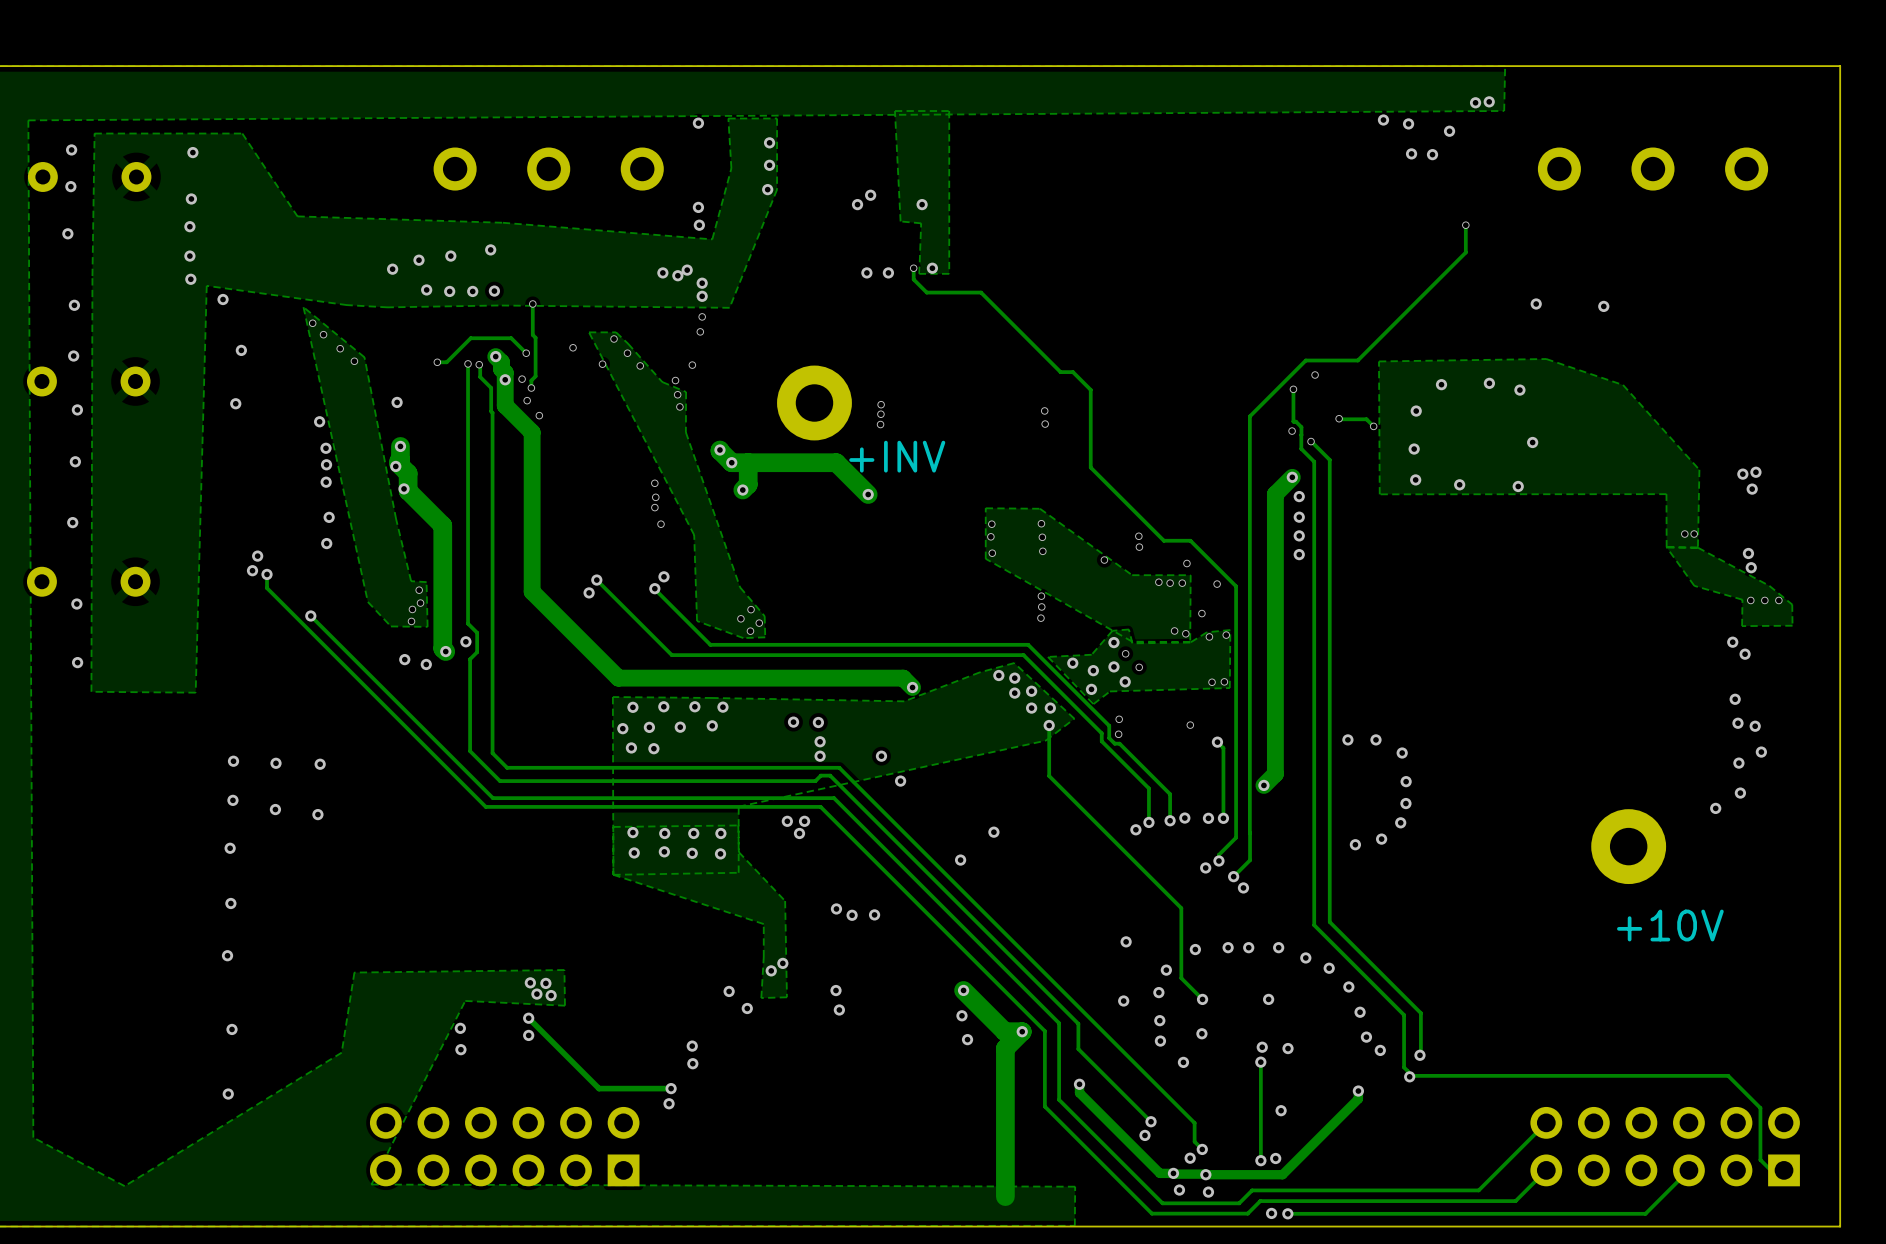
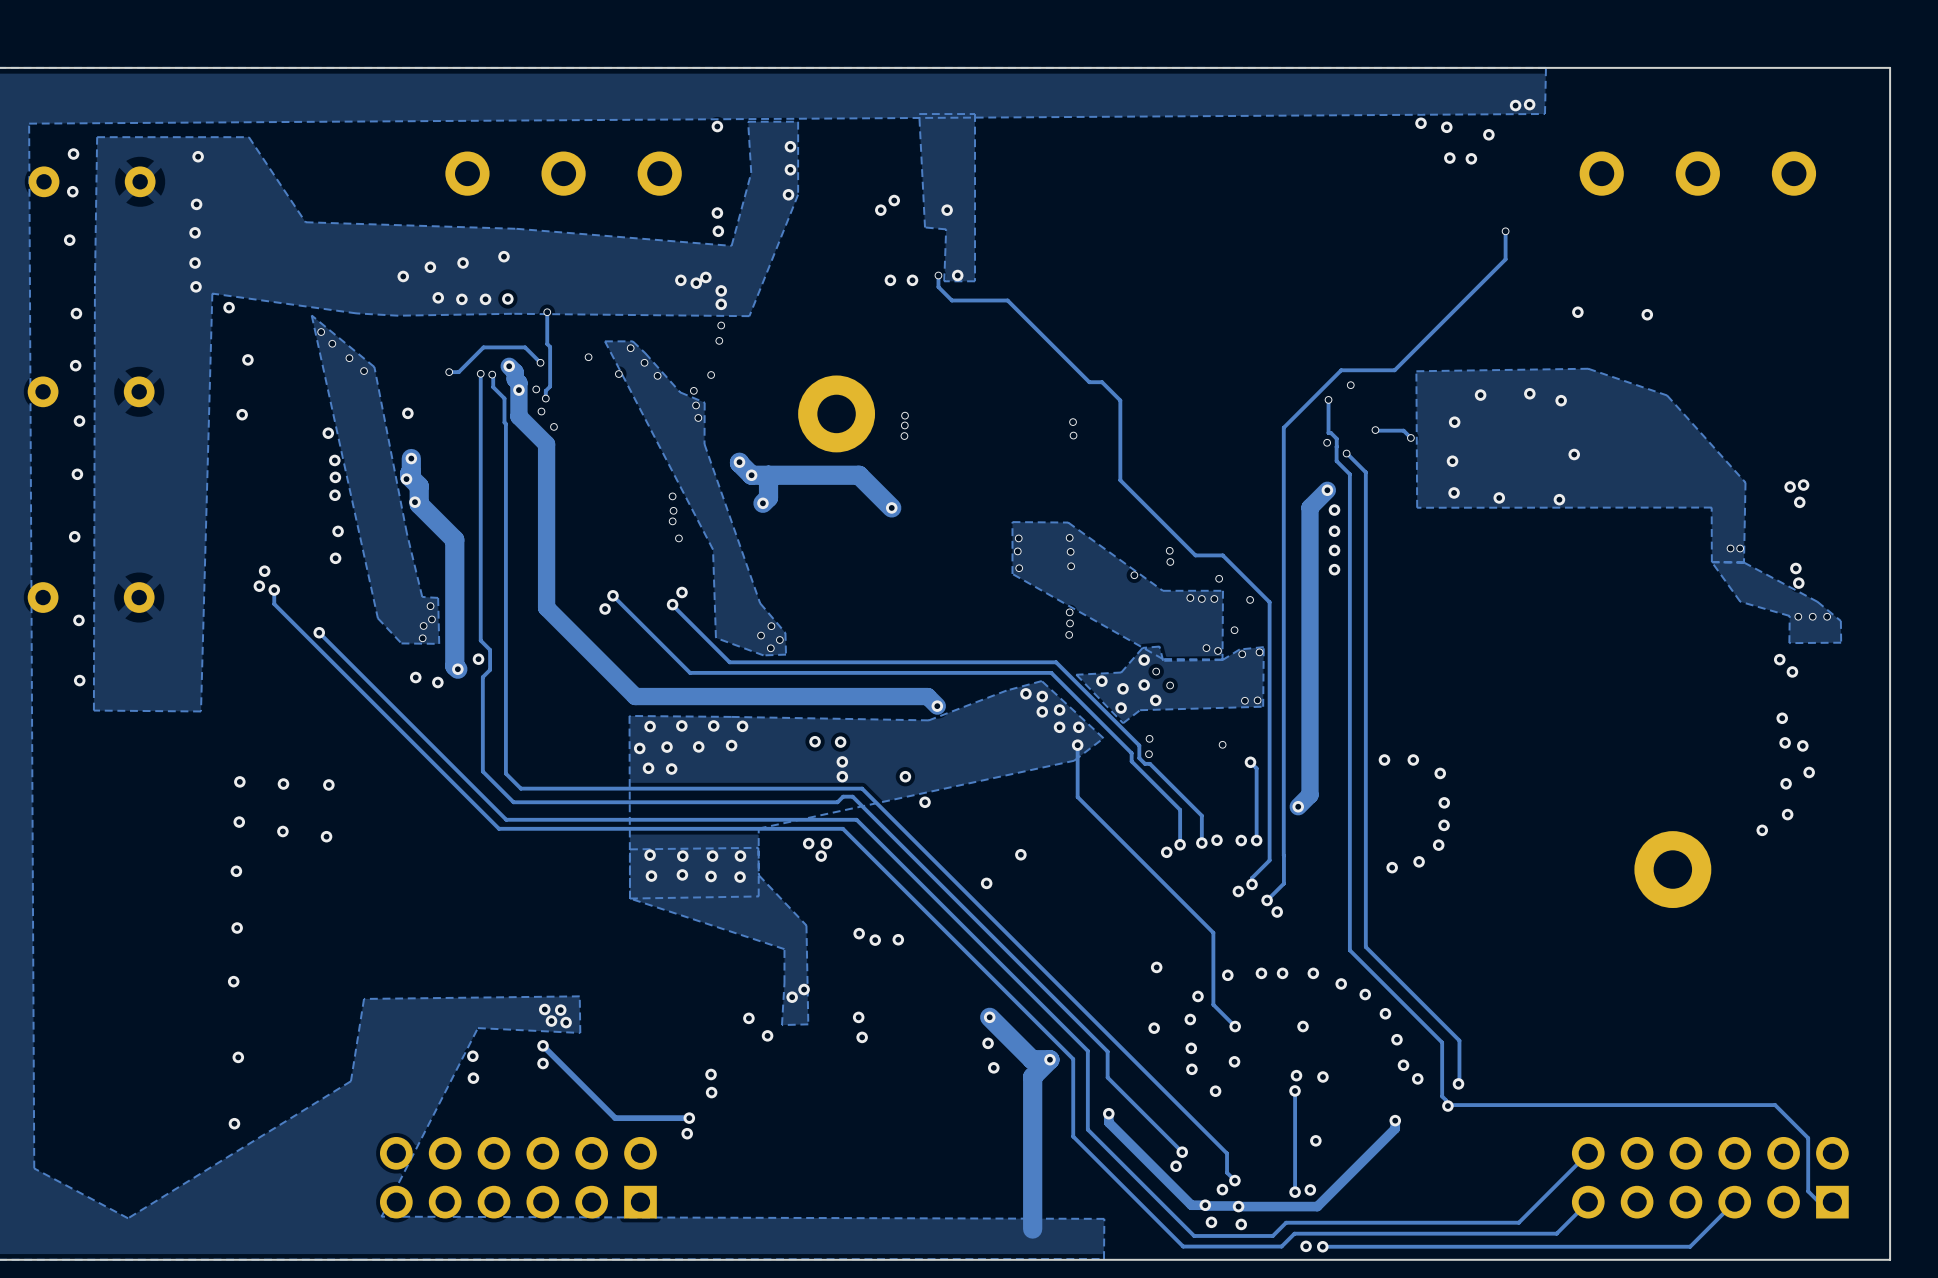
text: +INV (897, 456) -> none
text: +10V (1670, 925) -> none

